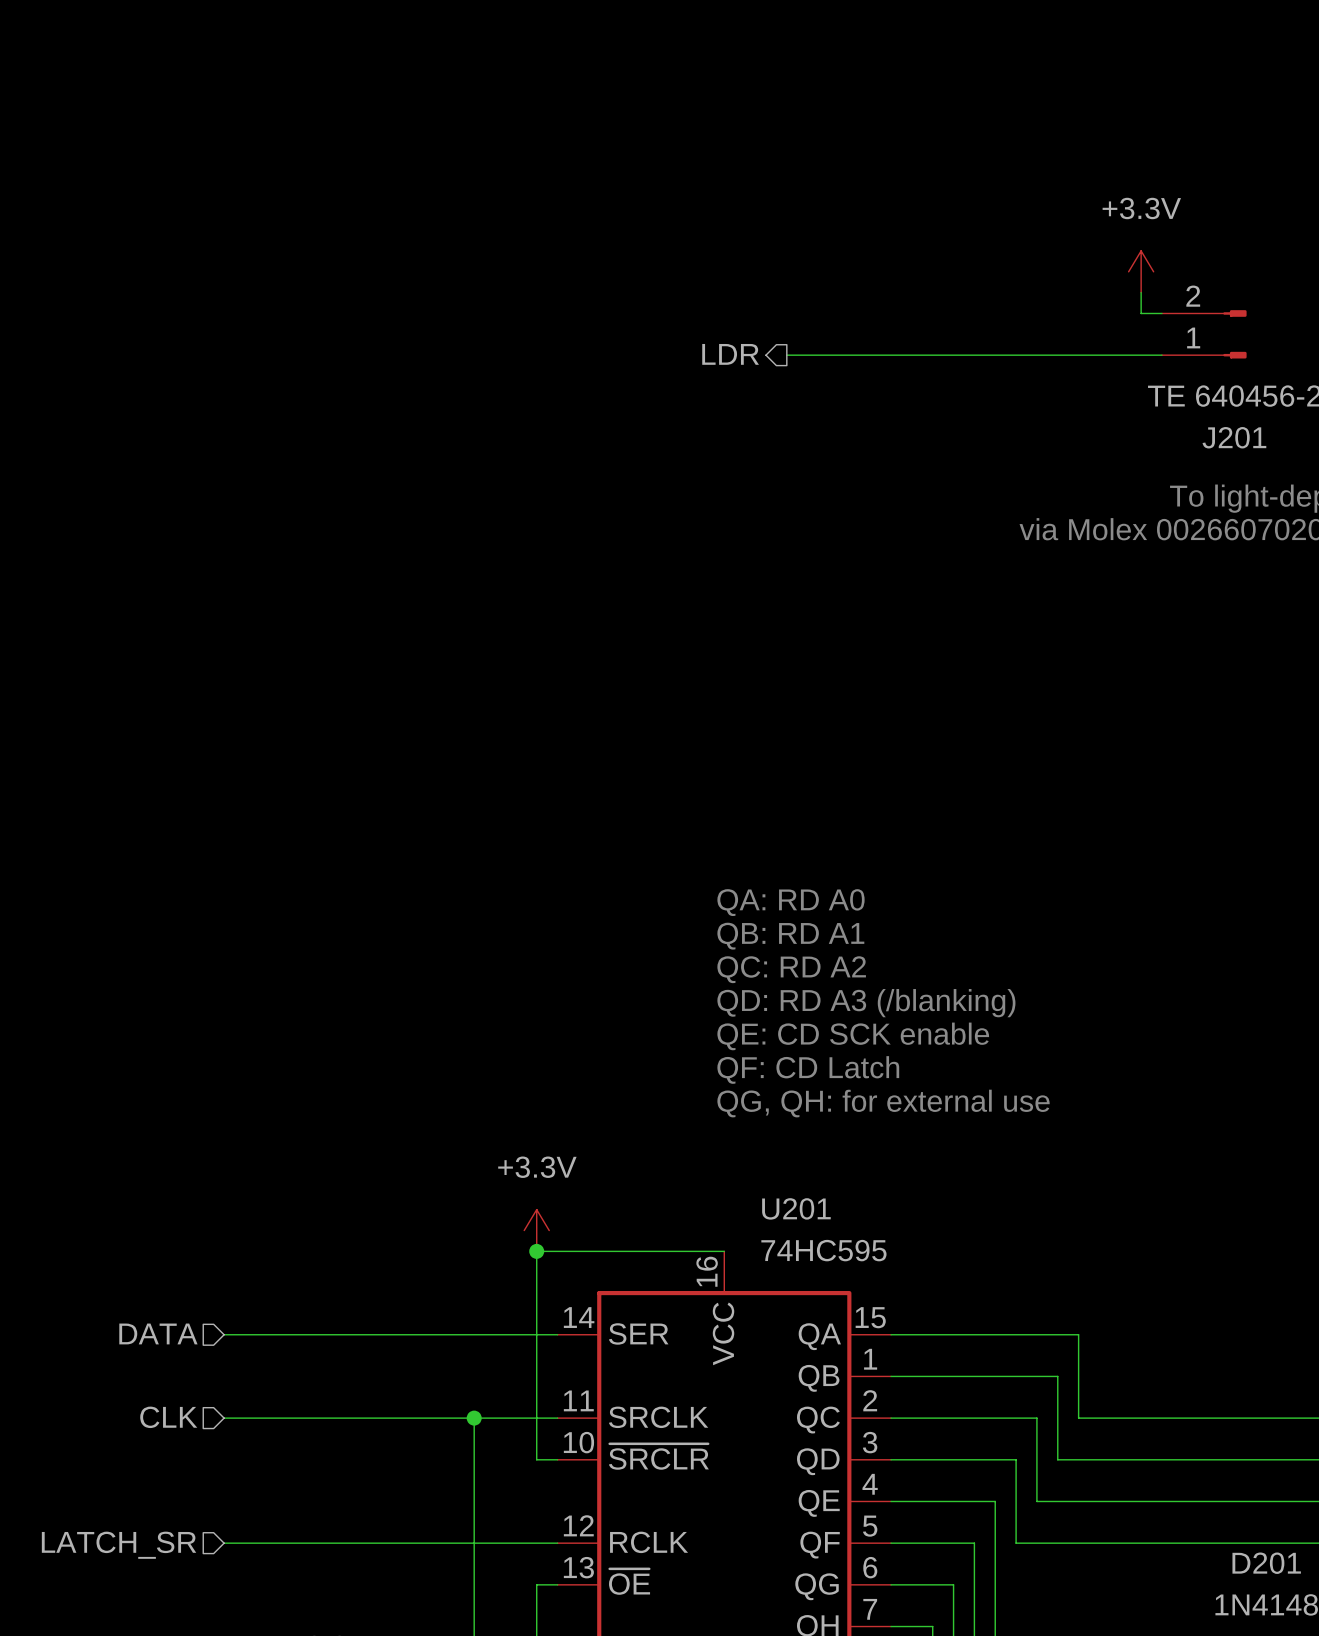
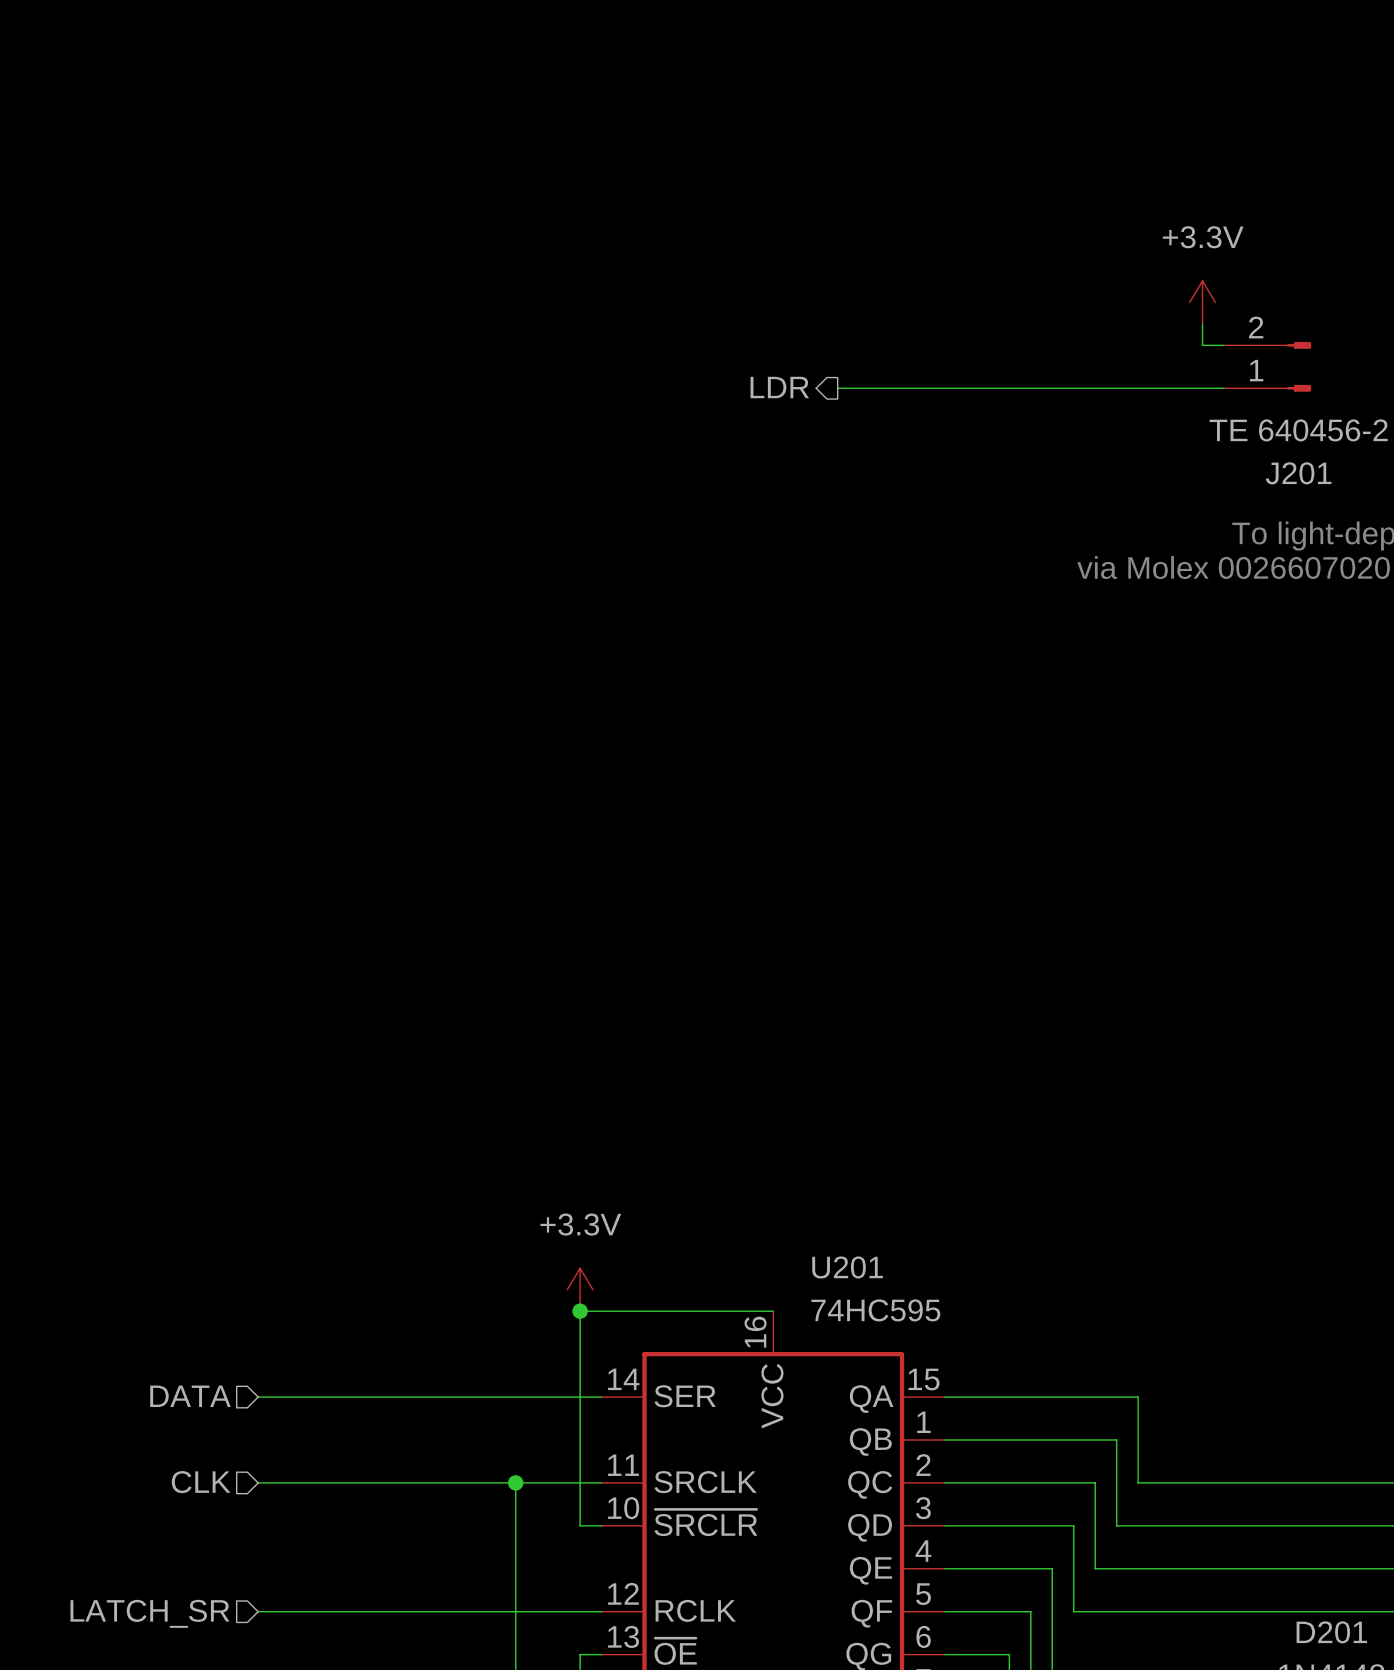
text: QA: RD A0 (791, 902) -> none
text: QB: RD A1 (790, 936) -> none
text: QC: RD A2 (791, 969) -> none
text: QD: RD A3 (/blanking) (866, 1003) -> none
text: QE: CD SCK enable (853, 1036) -> none
text: QF: CD Latch (808, 1069) -> none
text: QG, QH: for external use (883, 1103) -> none

